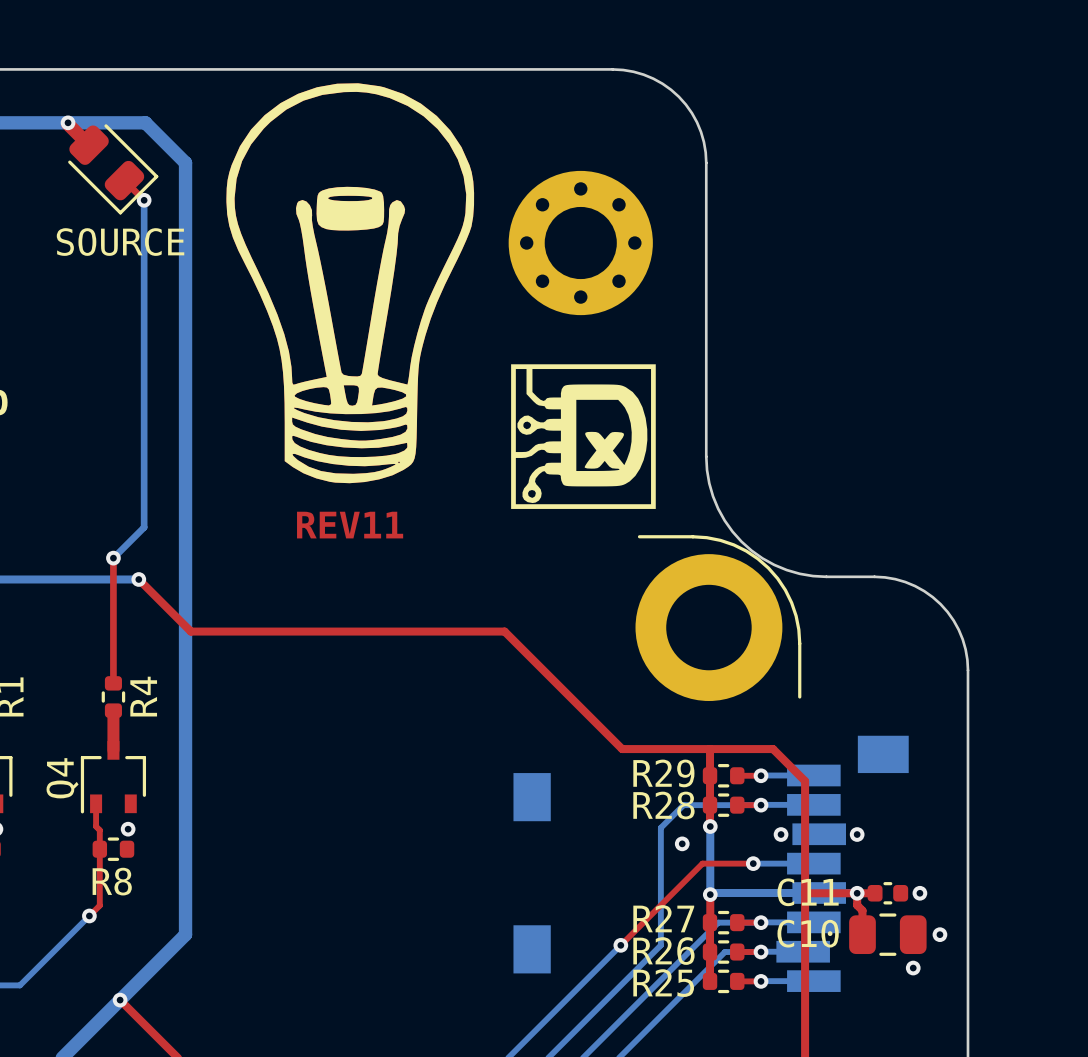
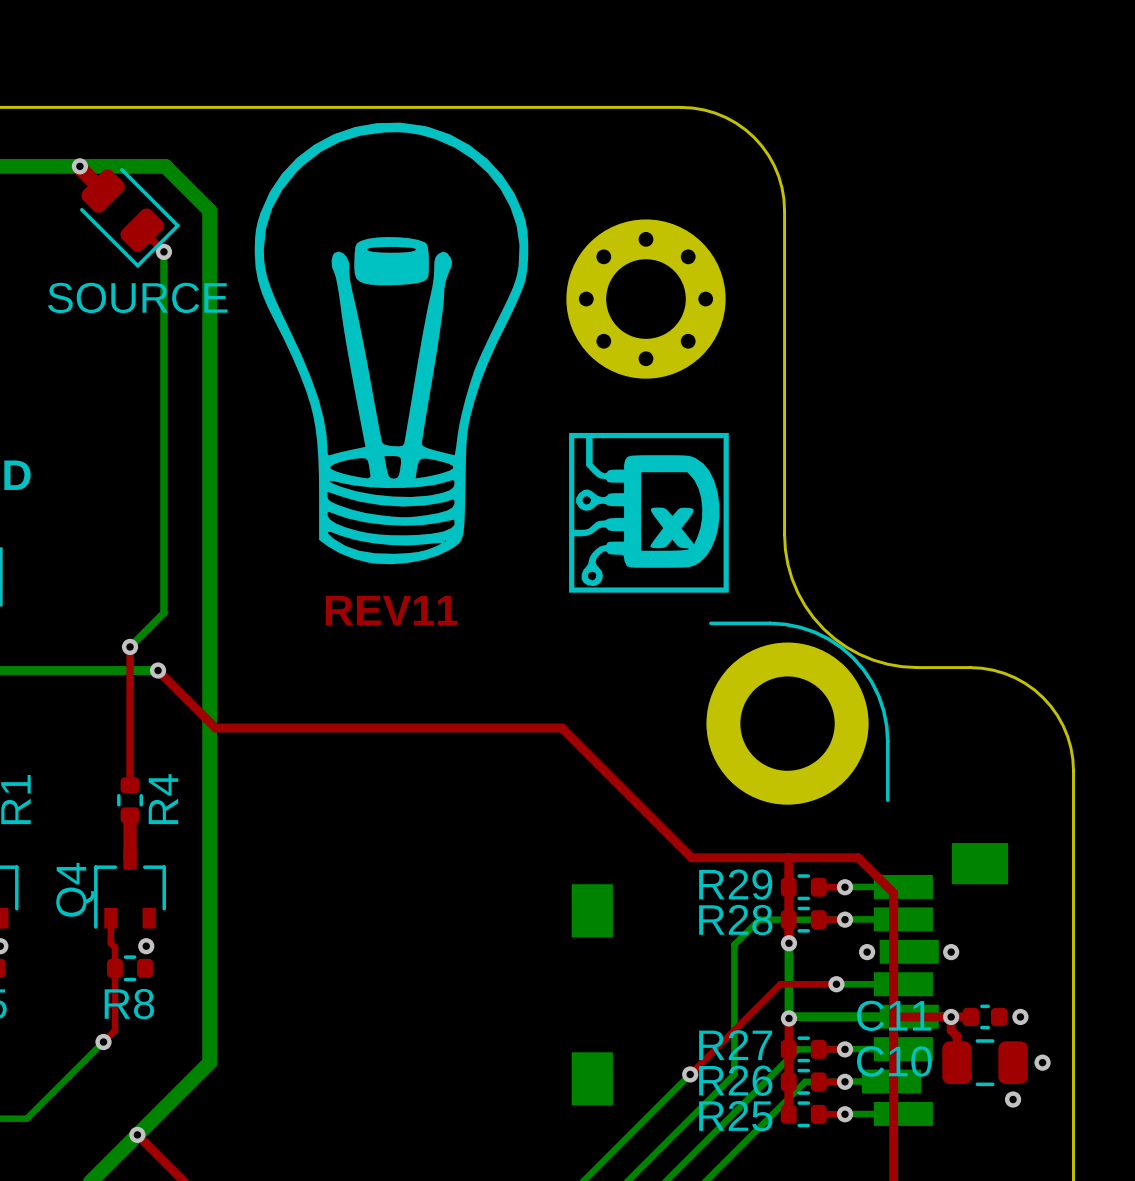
via: (682, 843) -> none

